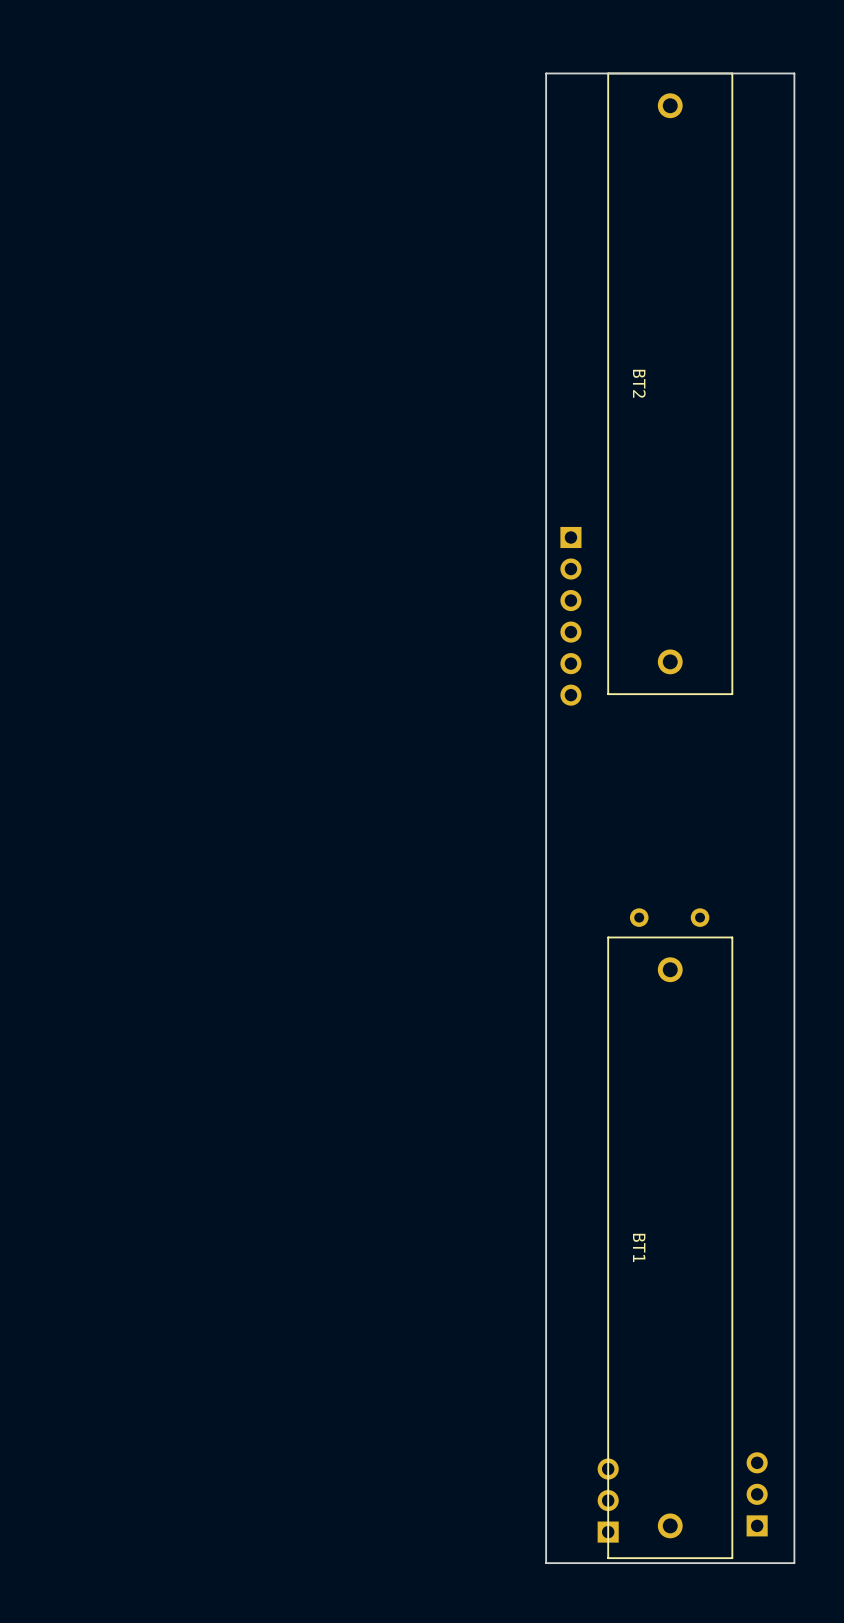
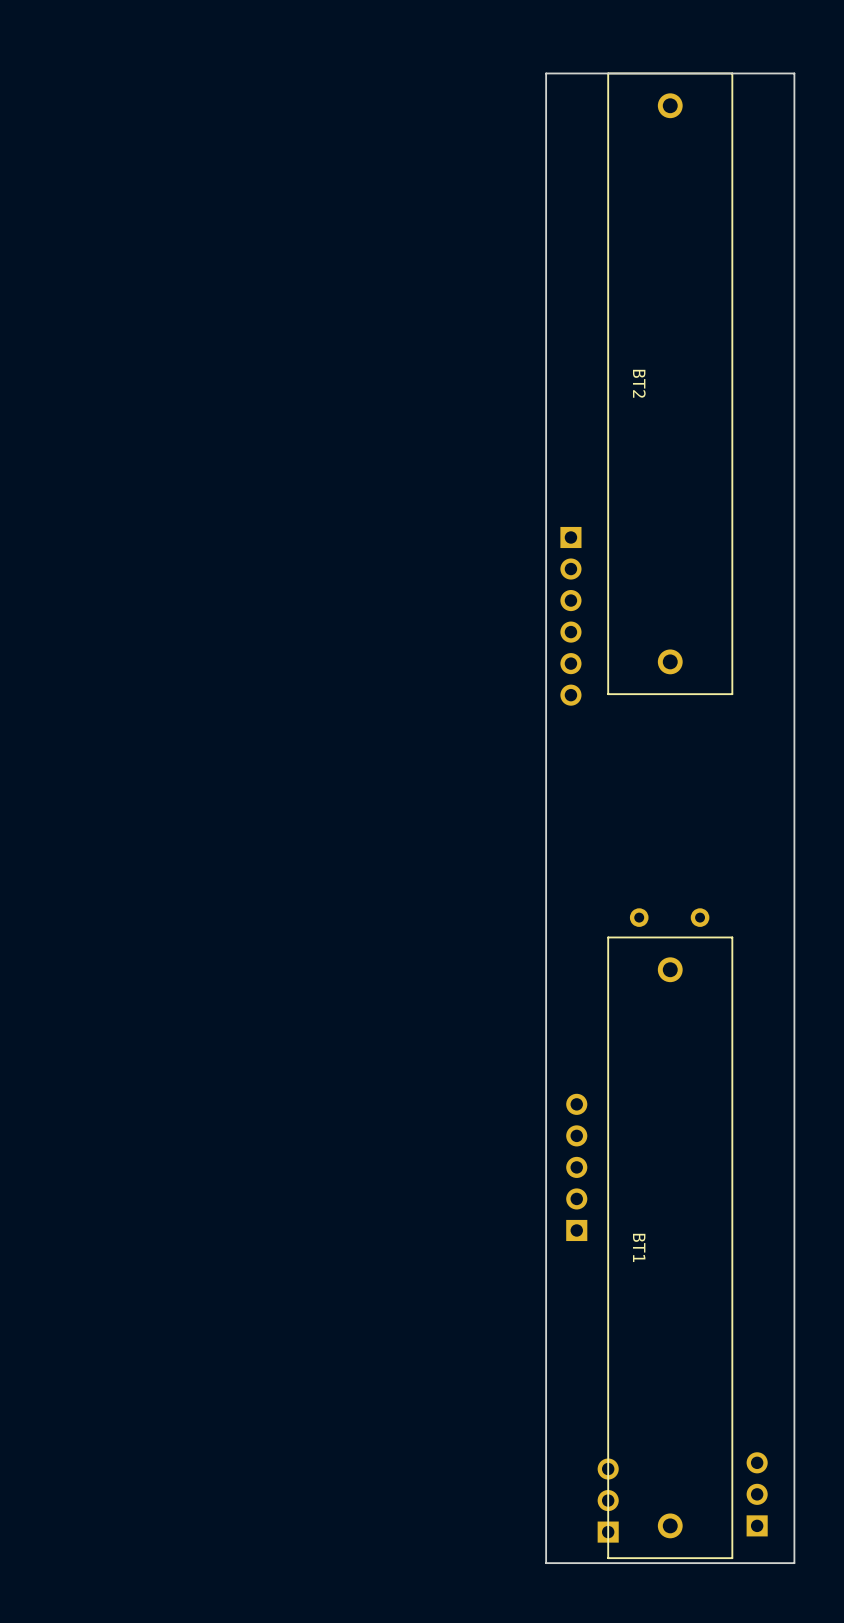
part: none -> (576, 1167)

